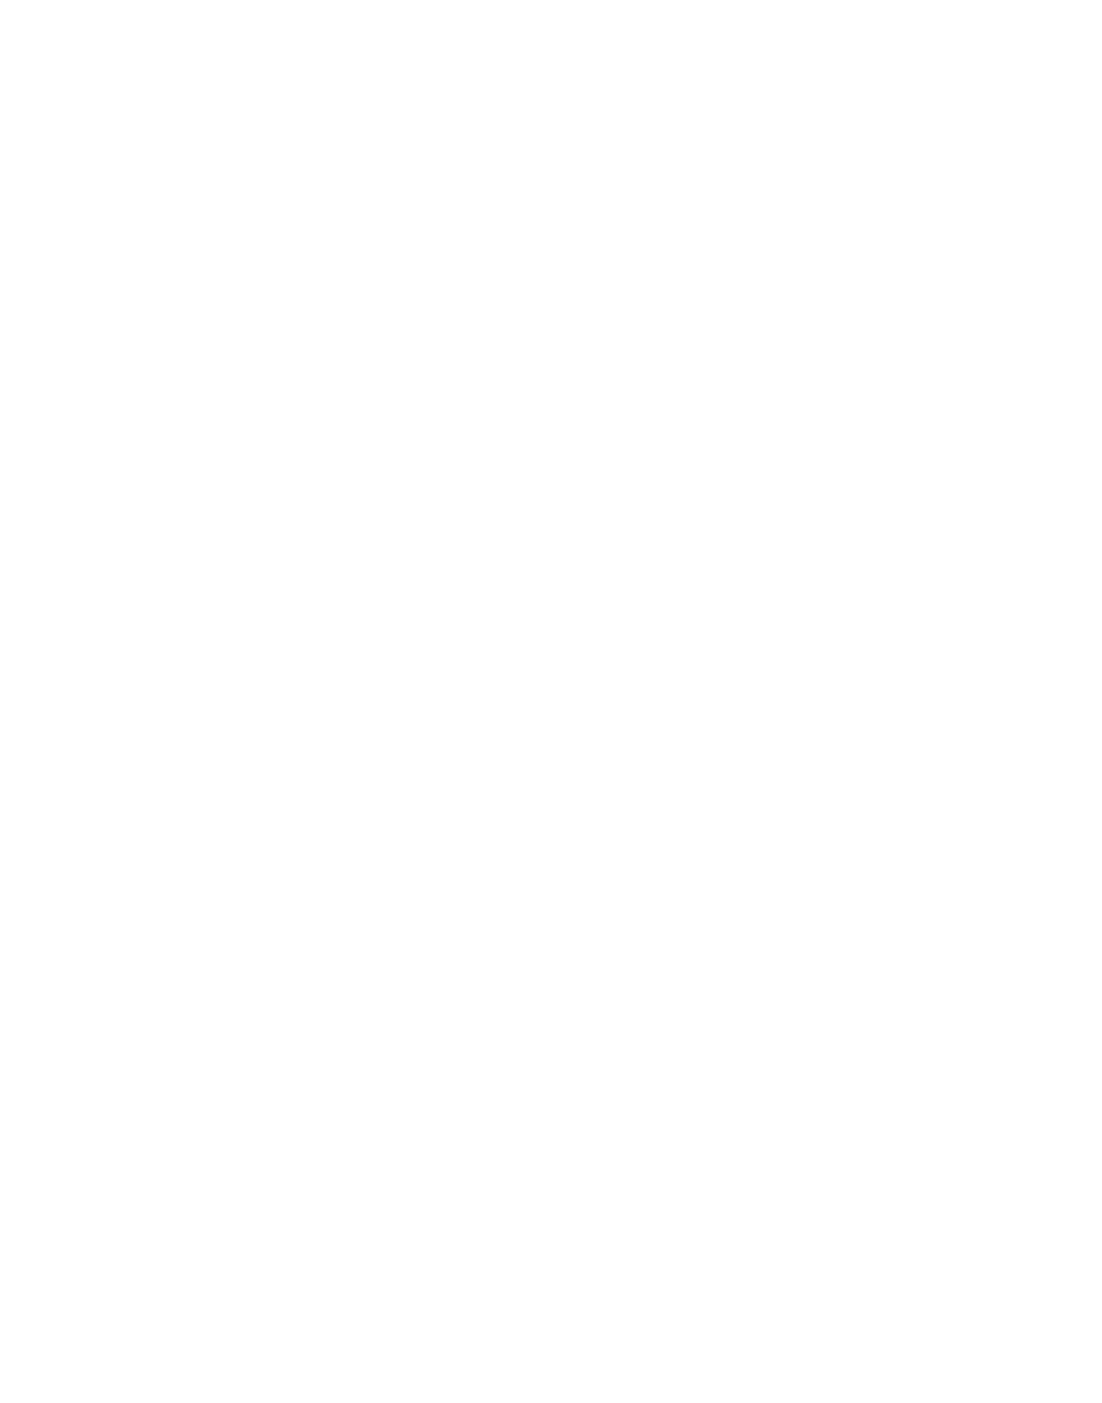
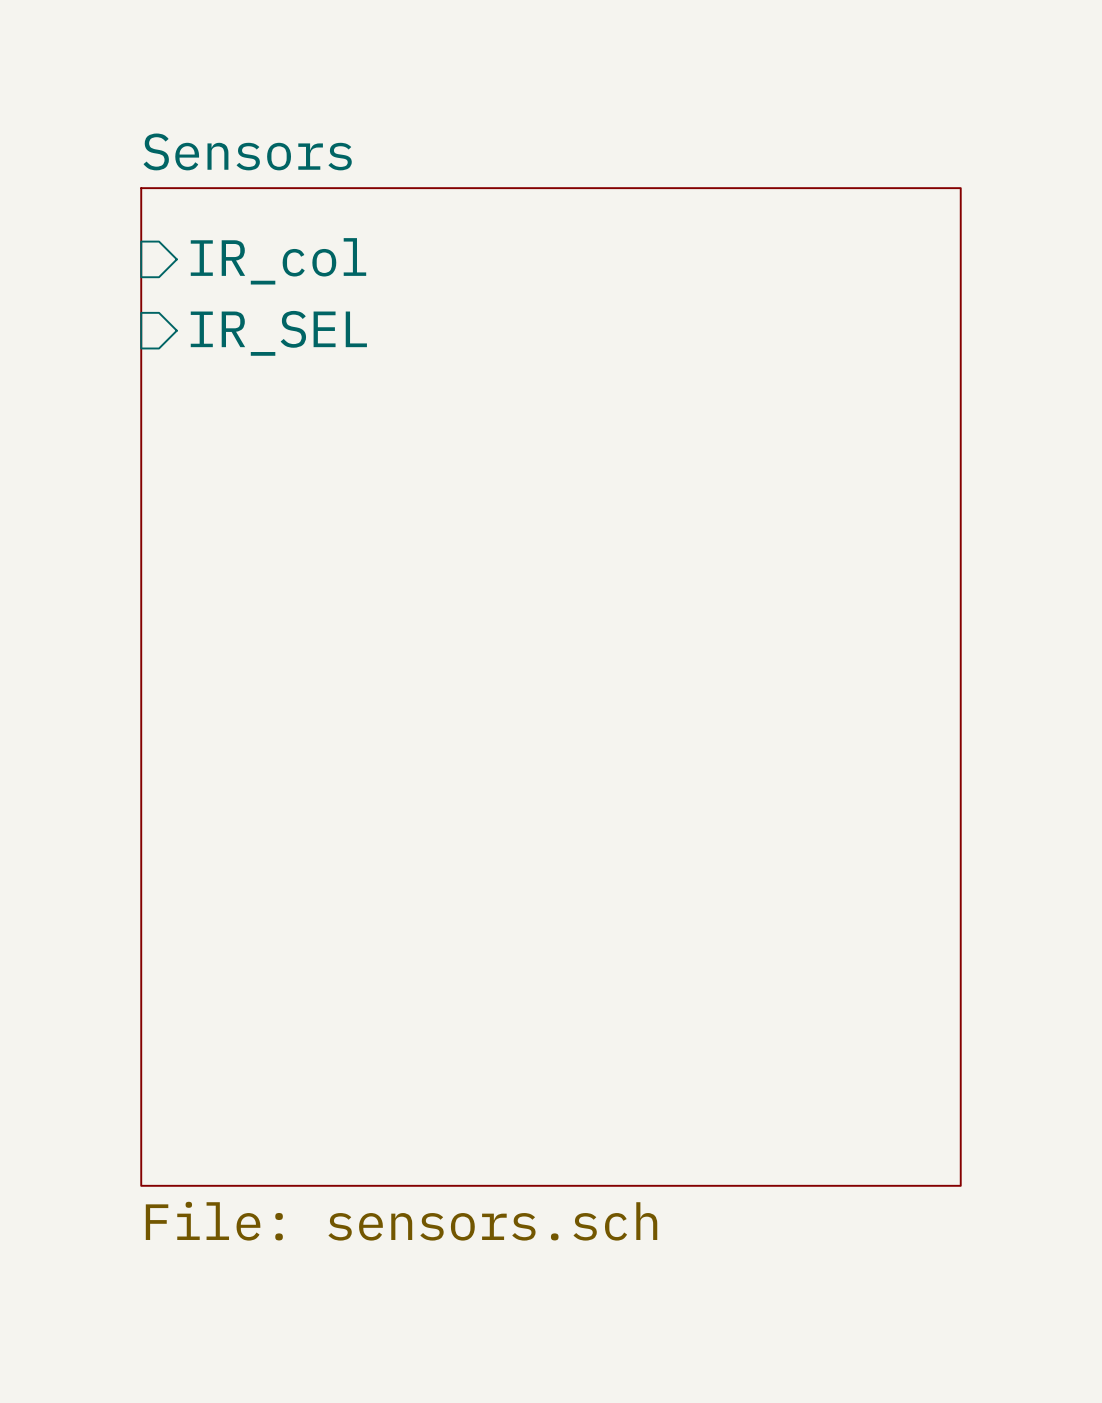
sheet pin: none -> IR_col (278, 261)
sheet pin: none -> IR_SEL (278, 333)
sheet Sensors: none -> File: sensors.sch (550, 686)

